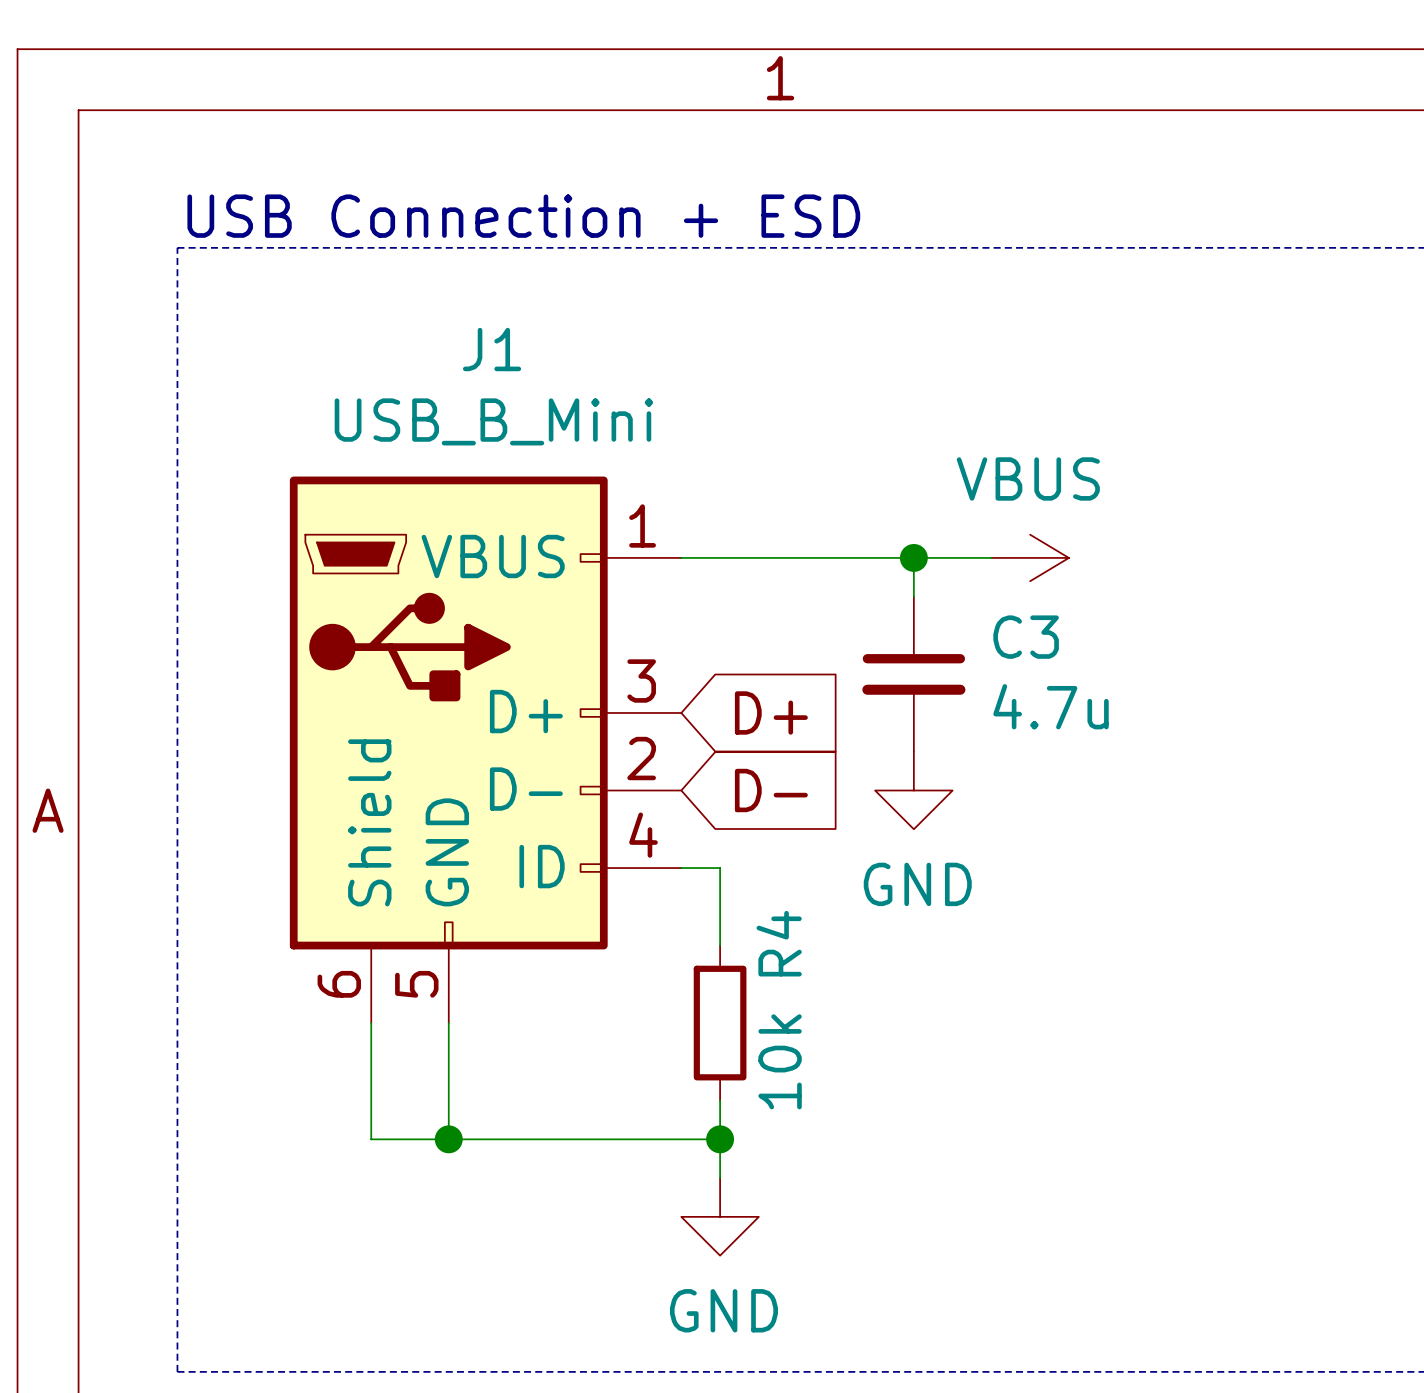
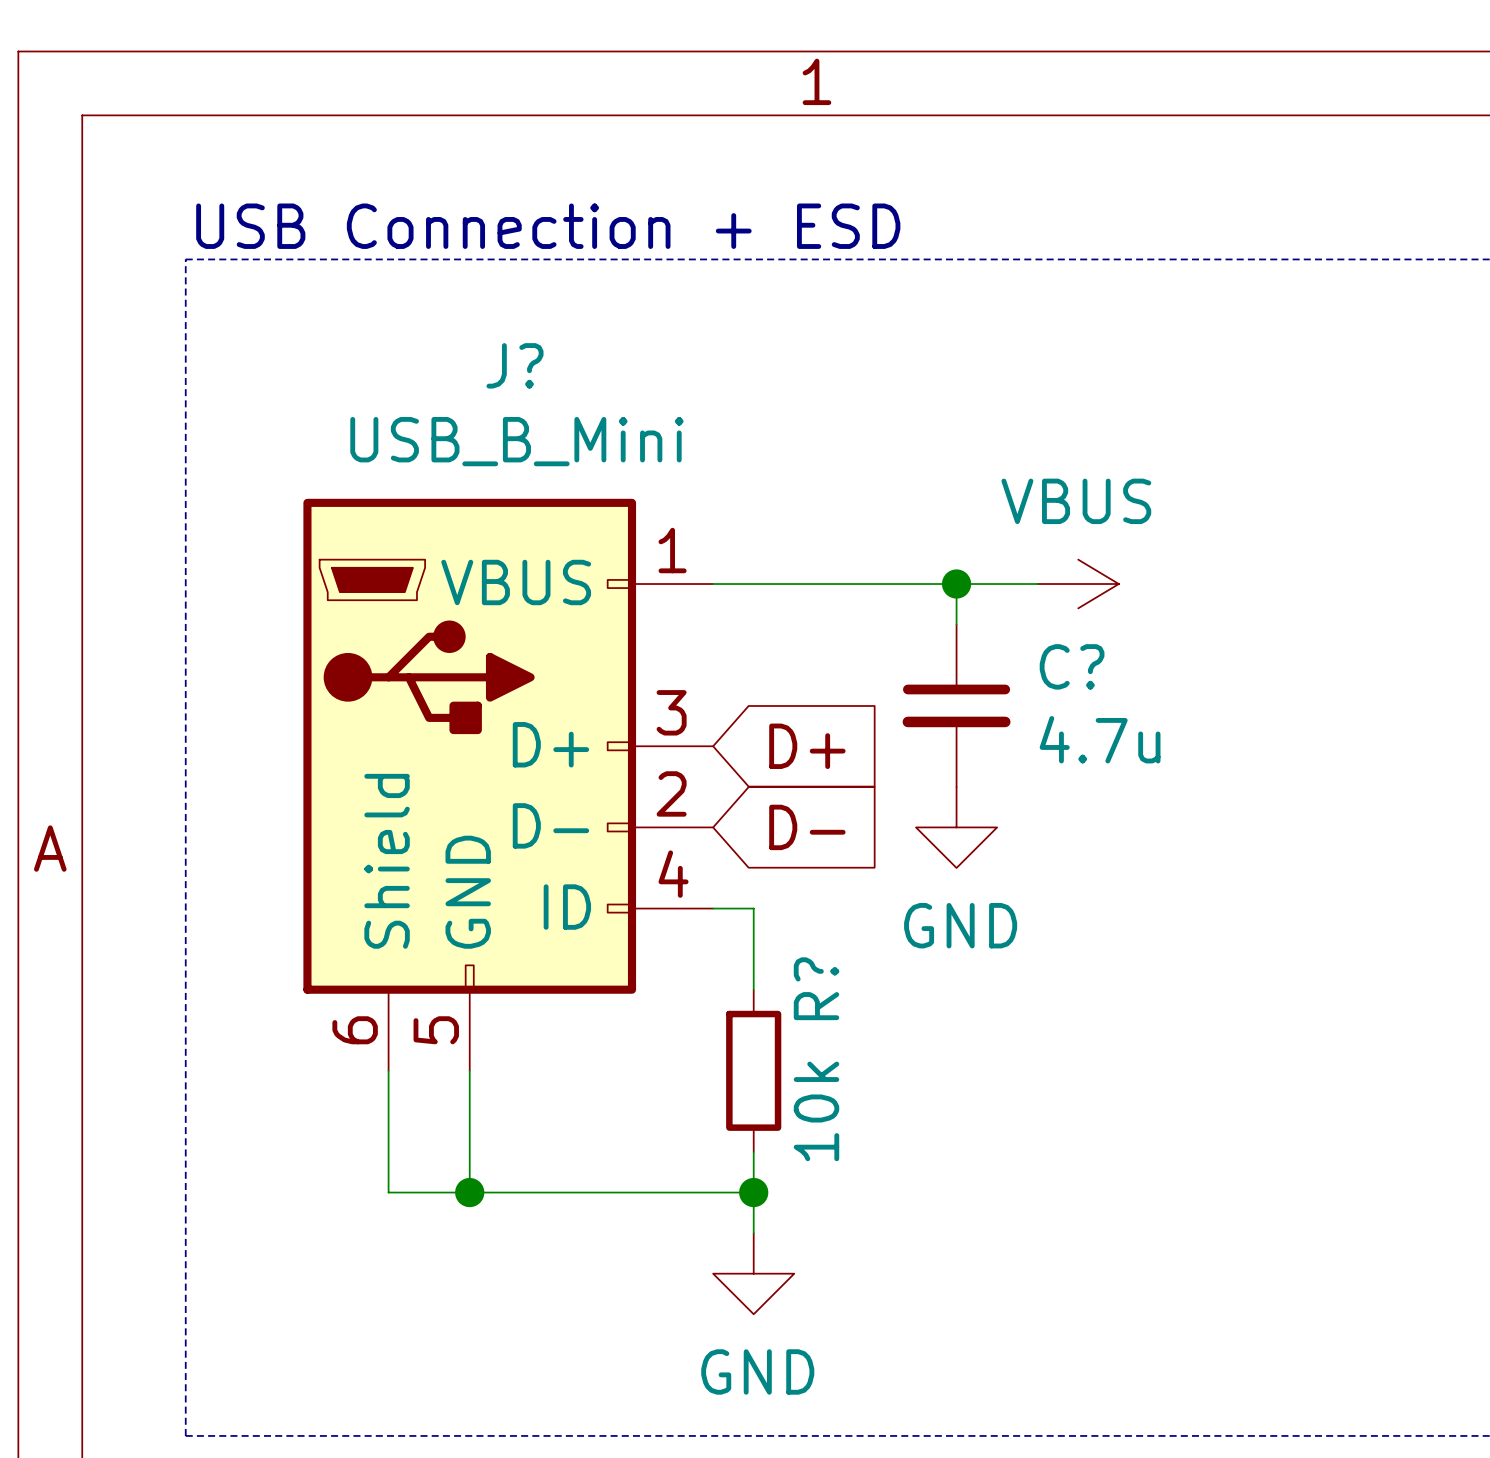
J1 name: J1 (492, 349) -> J? (515, 365)
C3 name: C3 (1026, 637) -> C? (1072, 666)
R4 name: R4 (779, 943) -> R? (816, 988)

